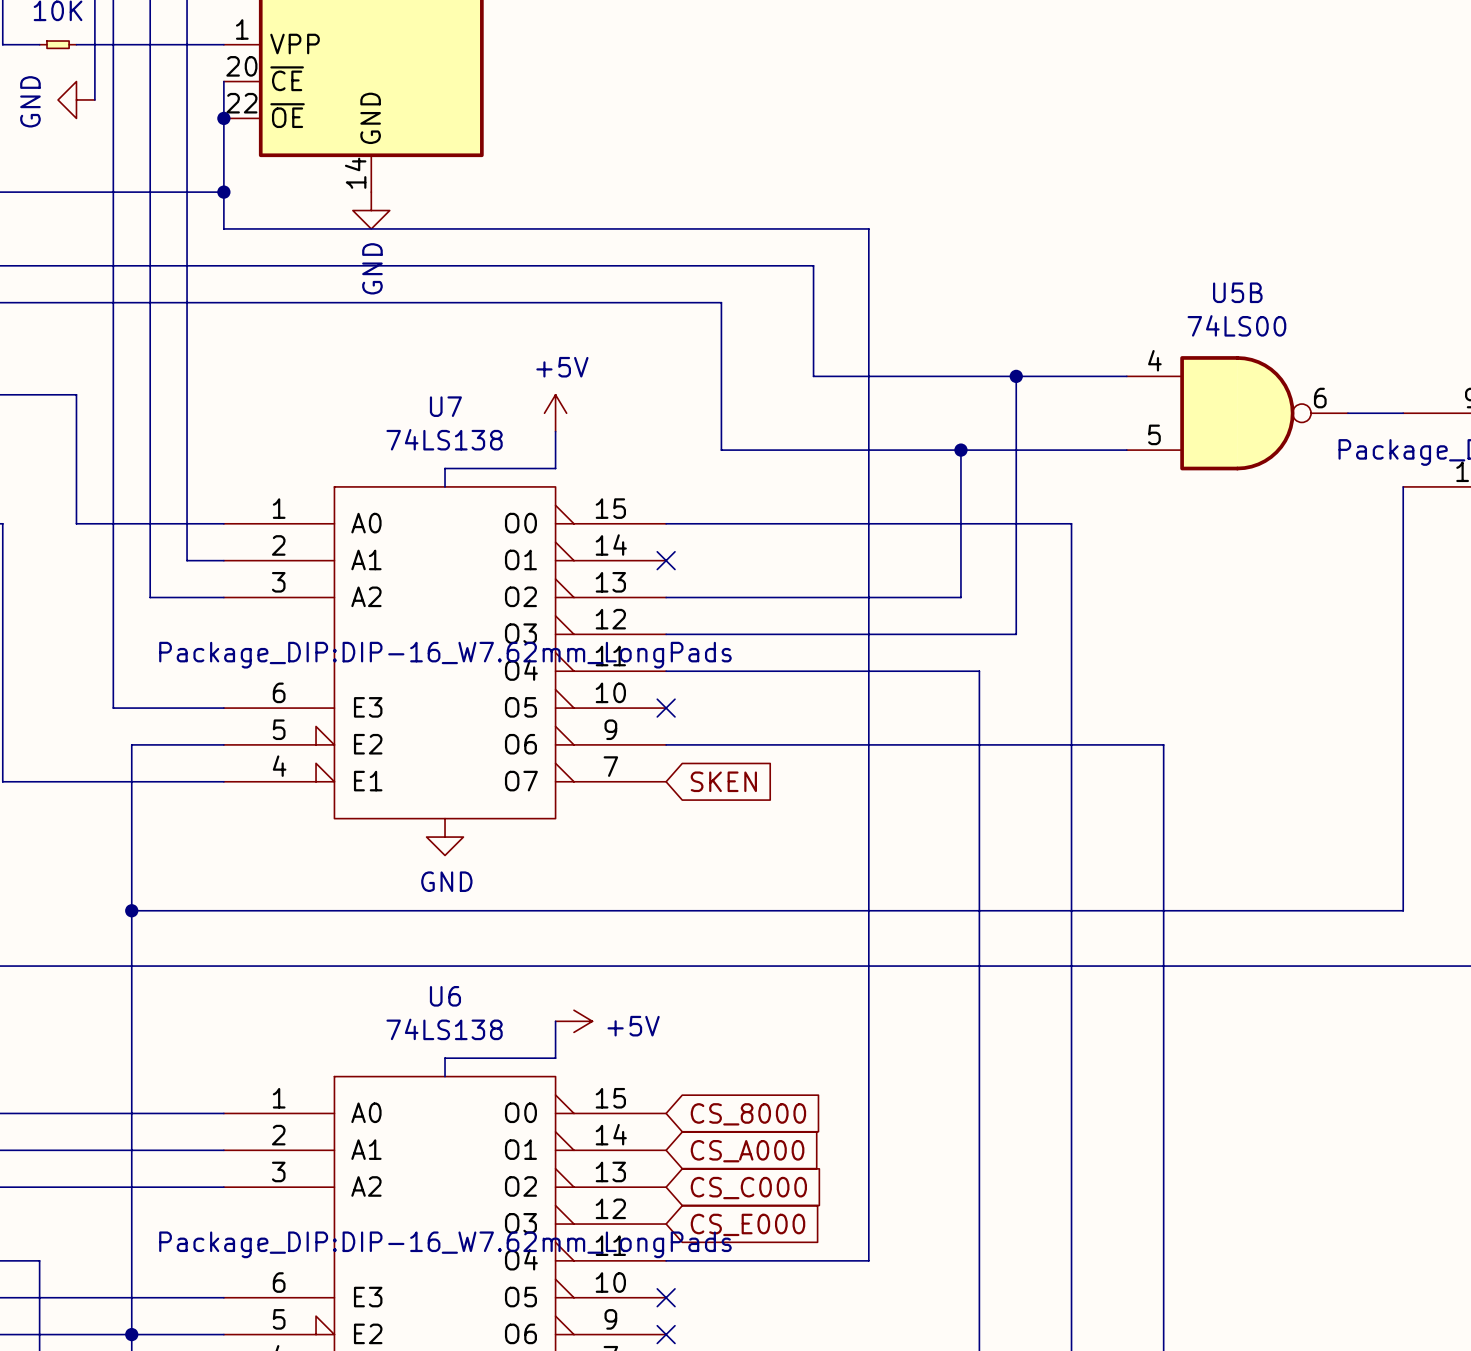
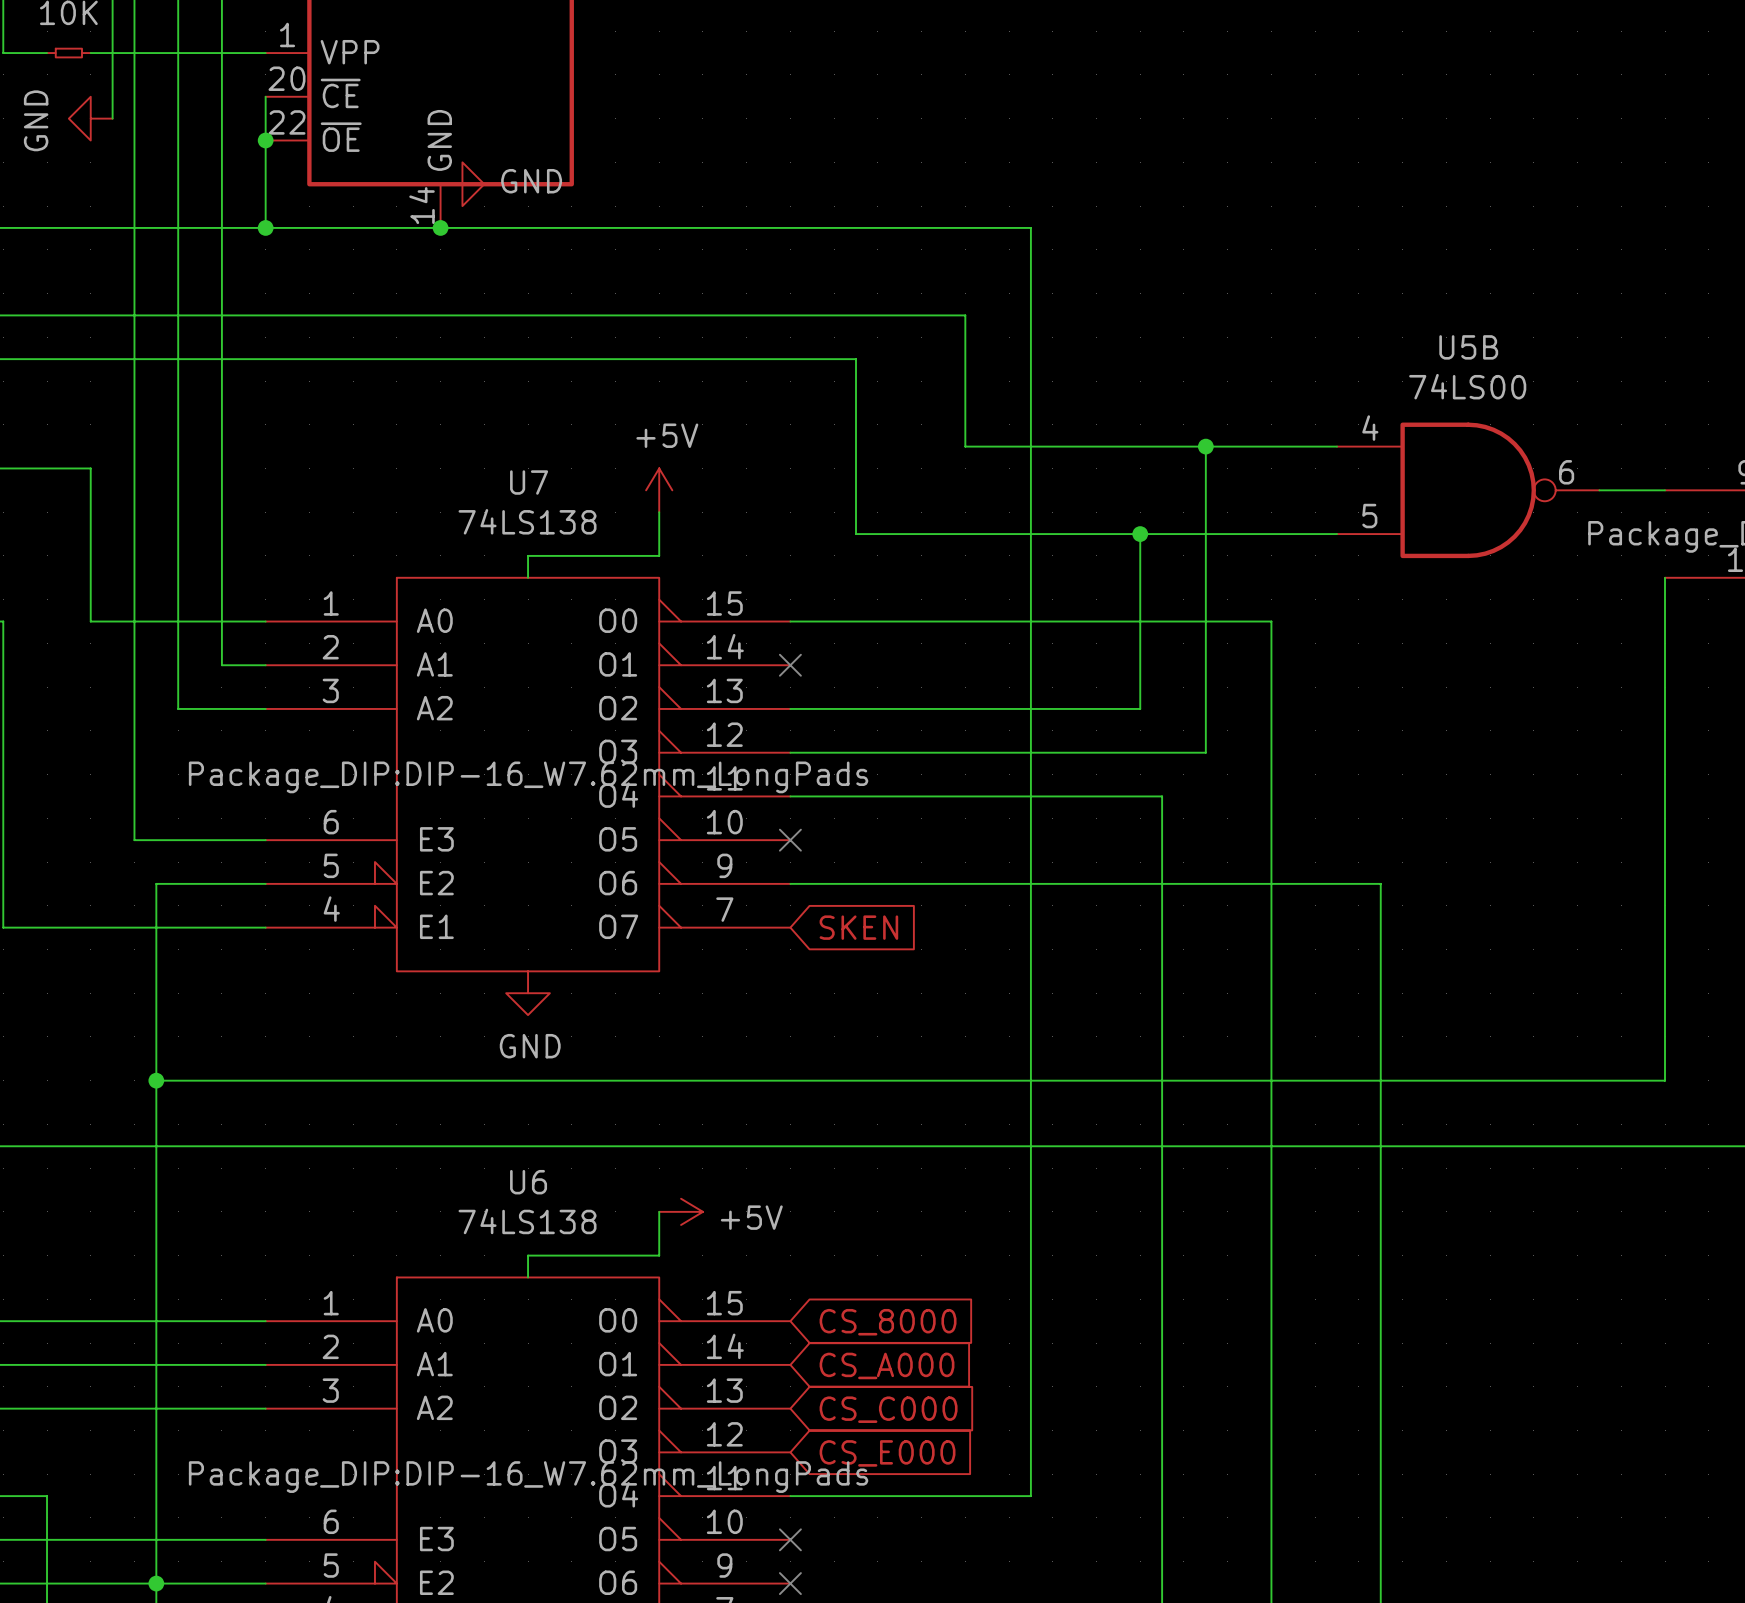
wire: (223, 192) (223, 228) (868, 228) -> (265, 227) (1030, 227) (1030, 271)
junction: none -> (440, 227)
power symbol rotation: 0° (371, 210) -> 90° counterclockwise (462, 184)
power symbol position: GND (371, 210) -> GND (462, 184)

